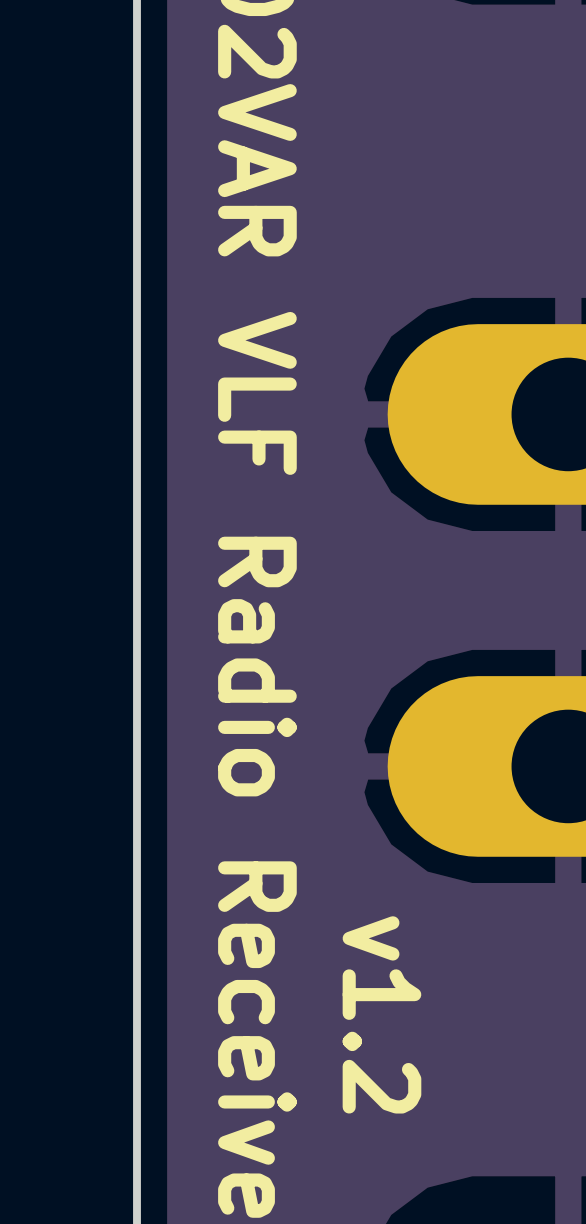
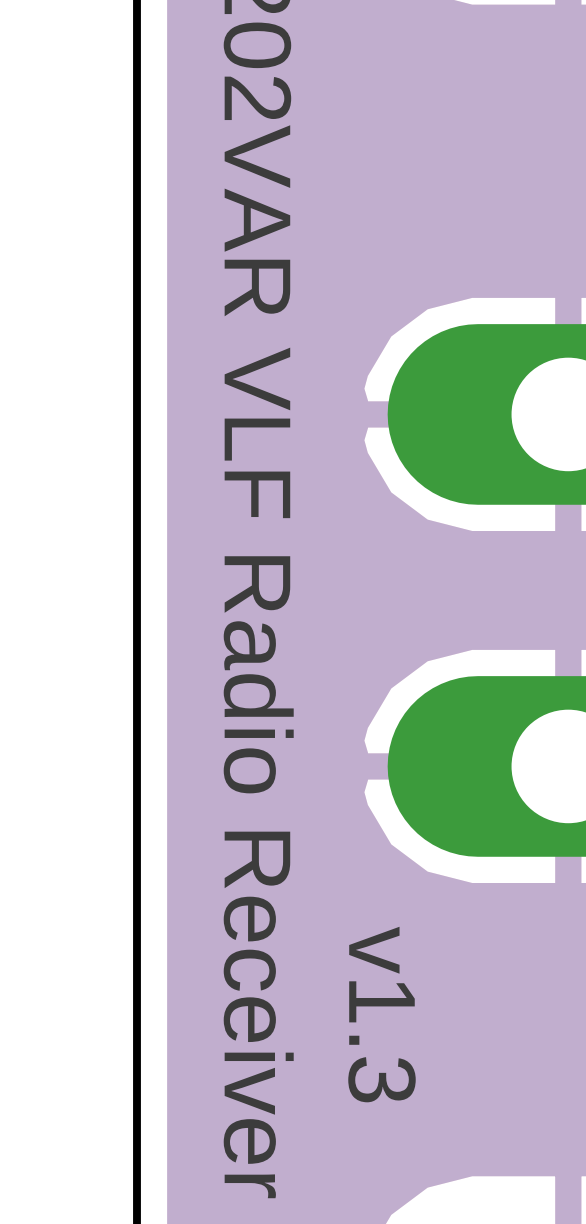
text: v1.2 (381, 1014) -> v1.3 (382, 1014)

